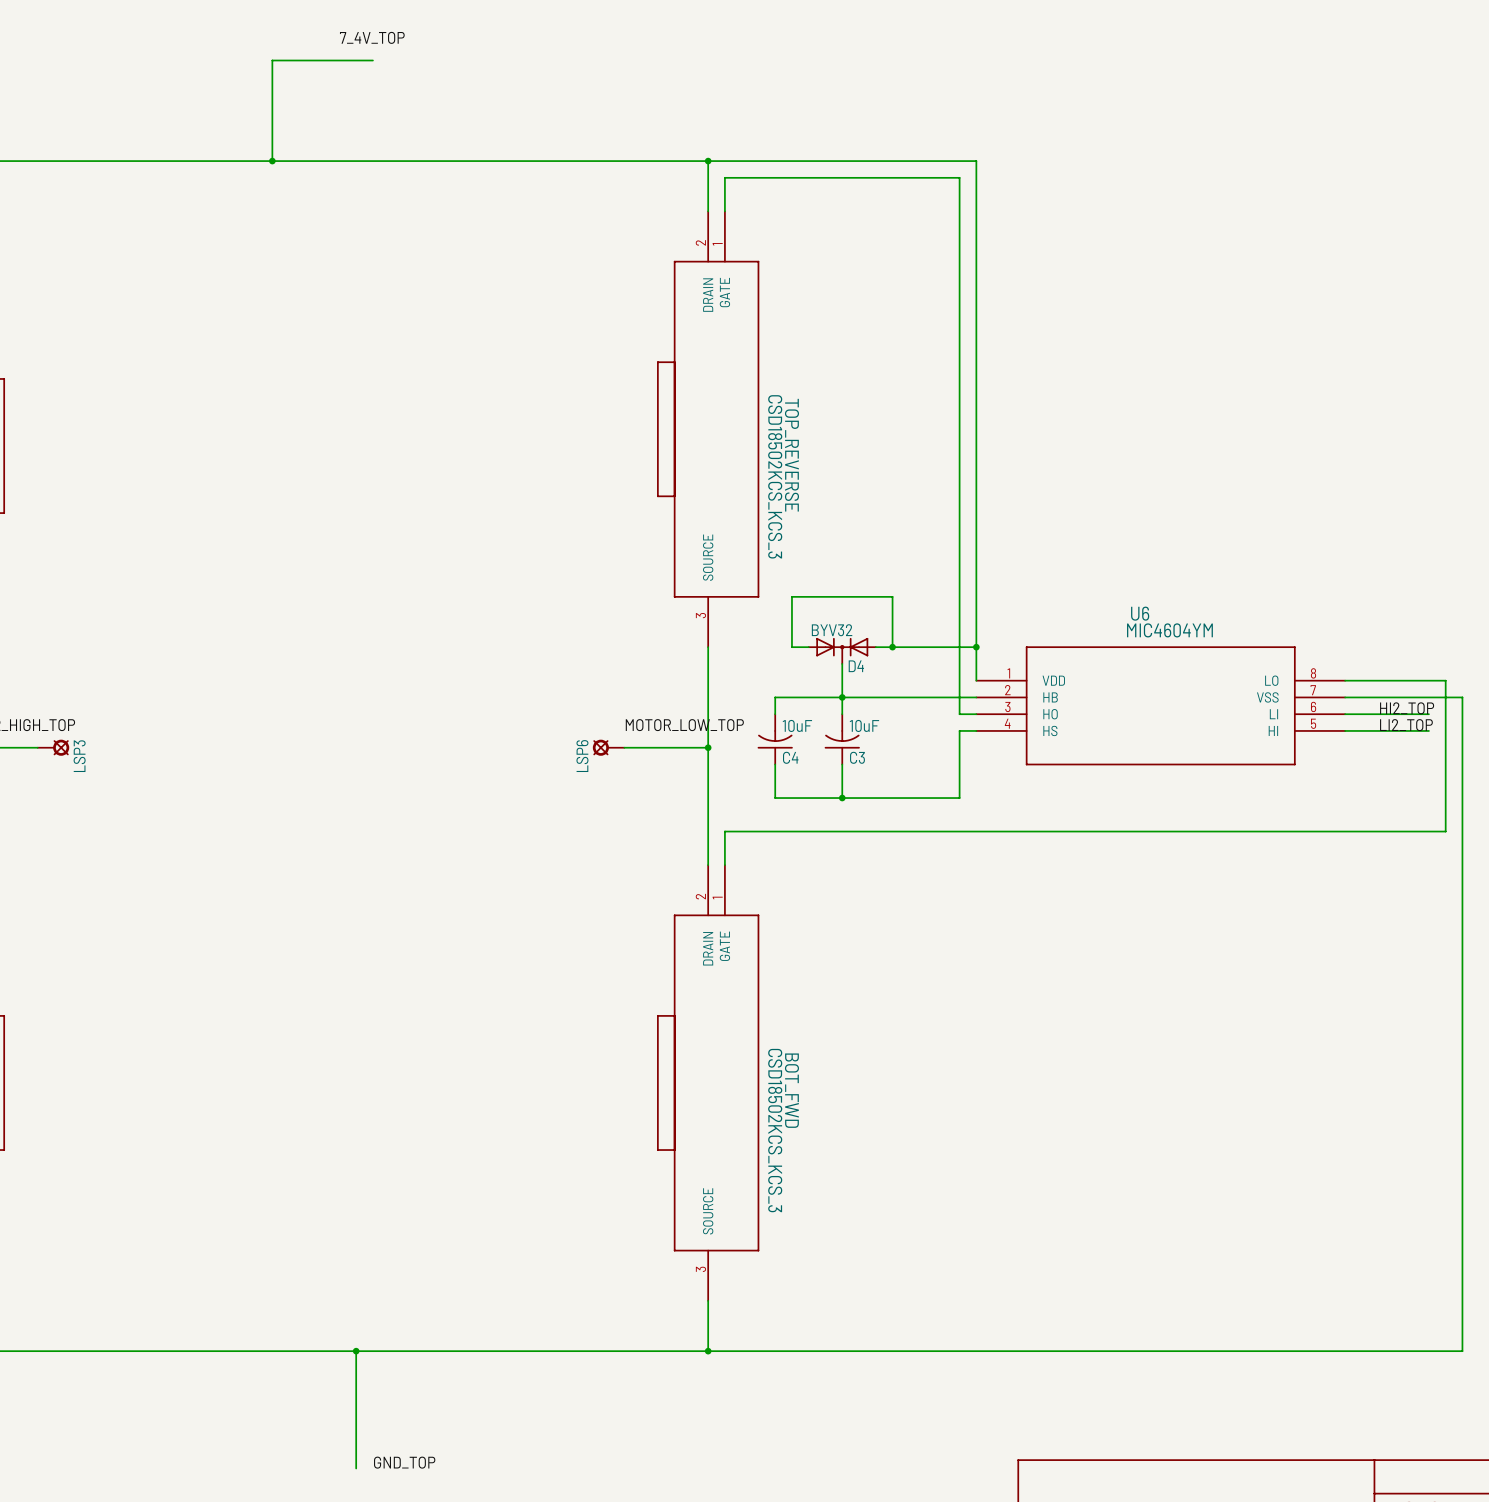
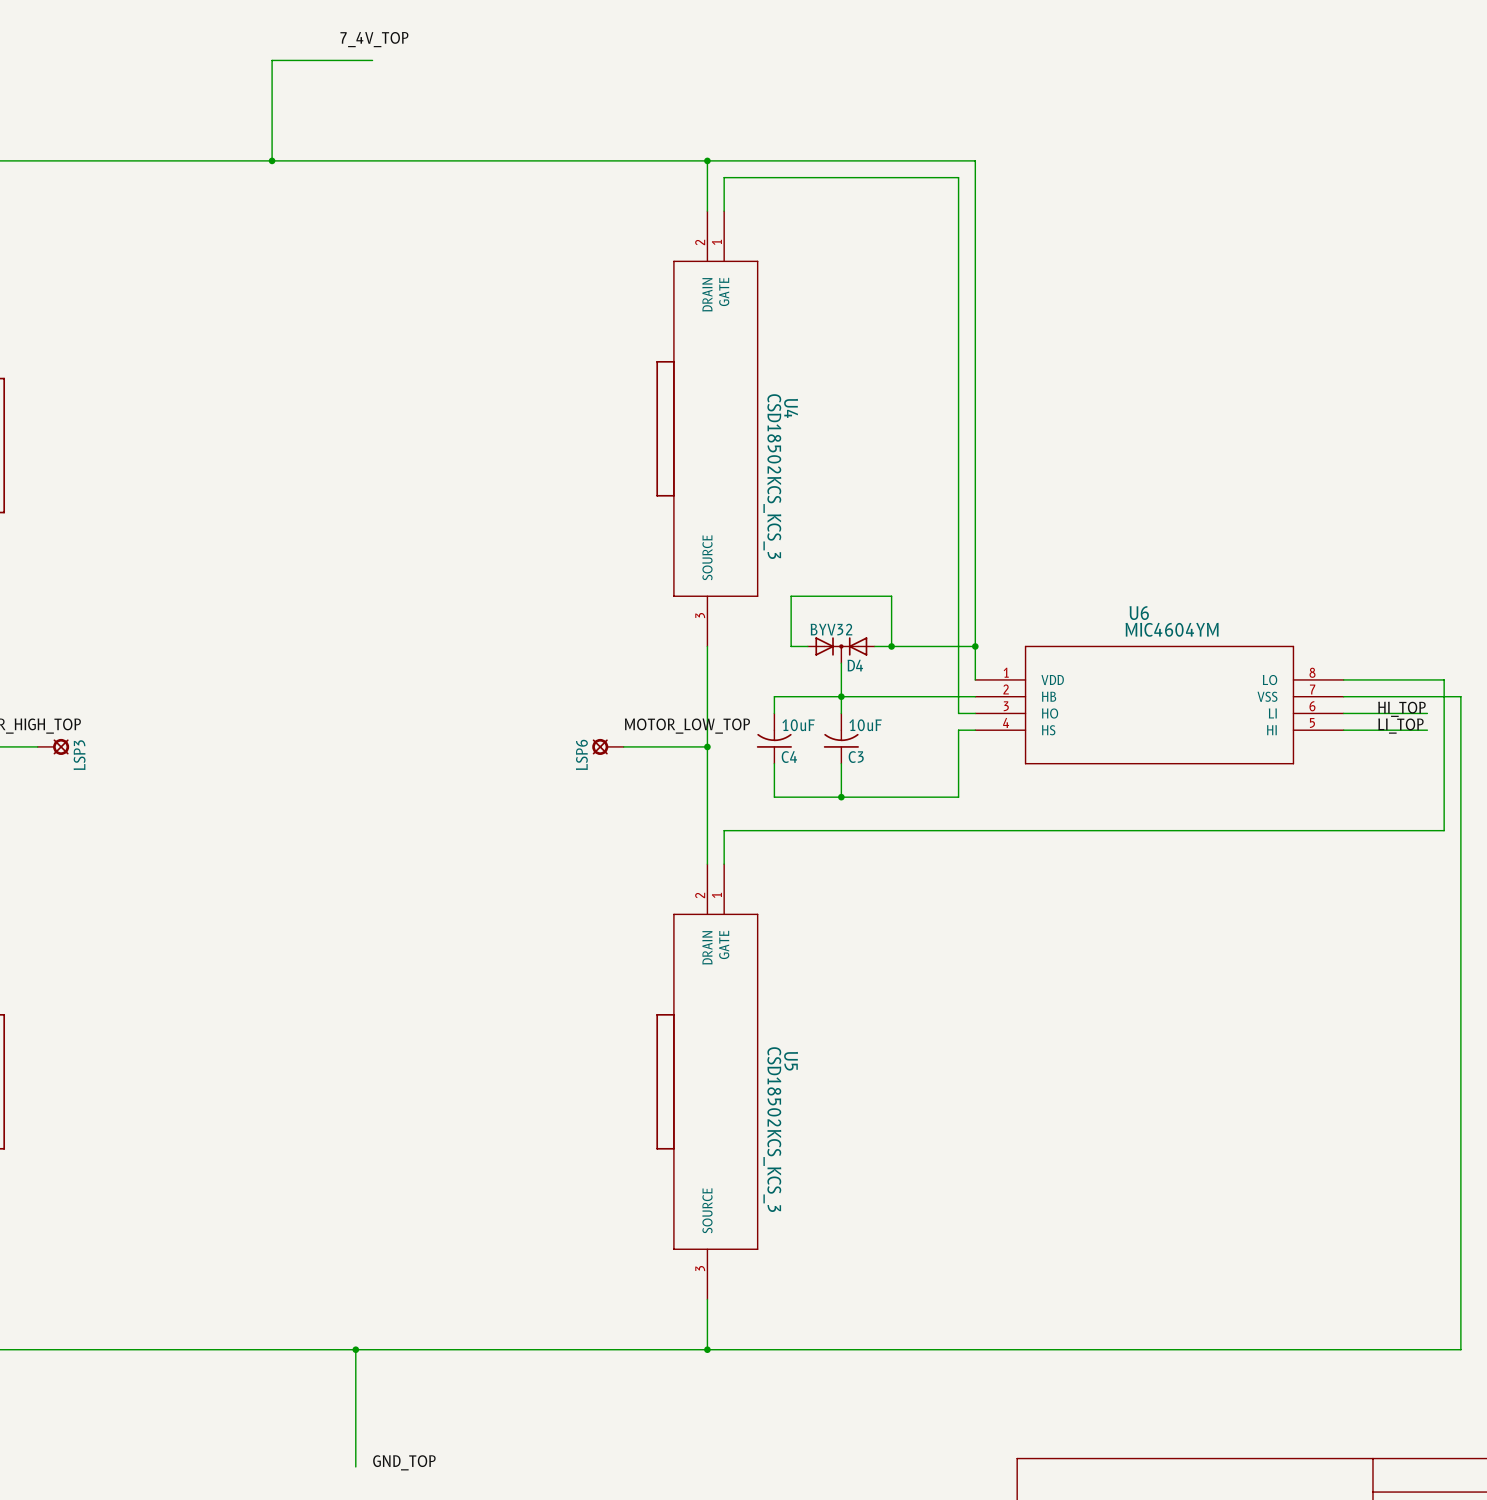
TOP_REVERSE name: TOP_REVERSE (791, 455) -> U4 (791, 408)
label: HI2_TOP (1407, 708) -> HI_TOP (1401, 709)
label: LI2_TOP (1406, 725) -> LI_TOP (1400, 726)
BOT_FWD name: BOT_FWD (791, 1090) -> U5 (791, 1061)

